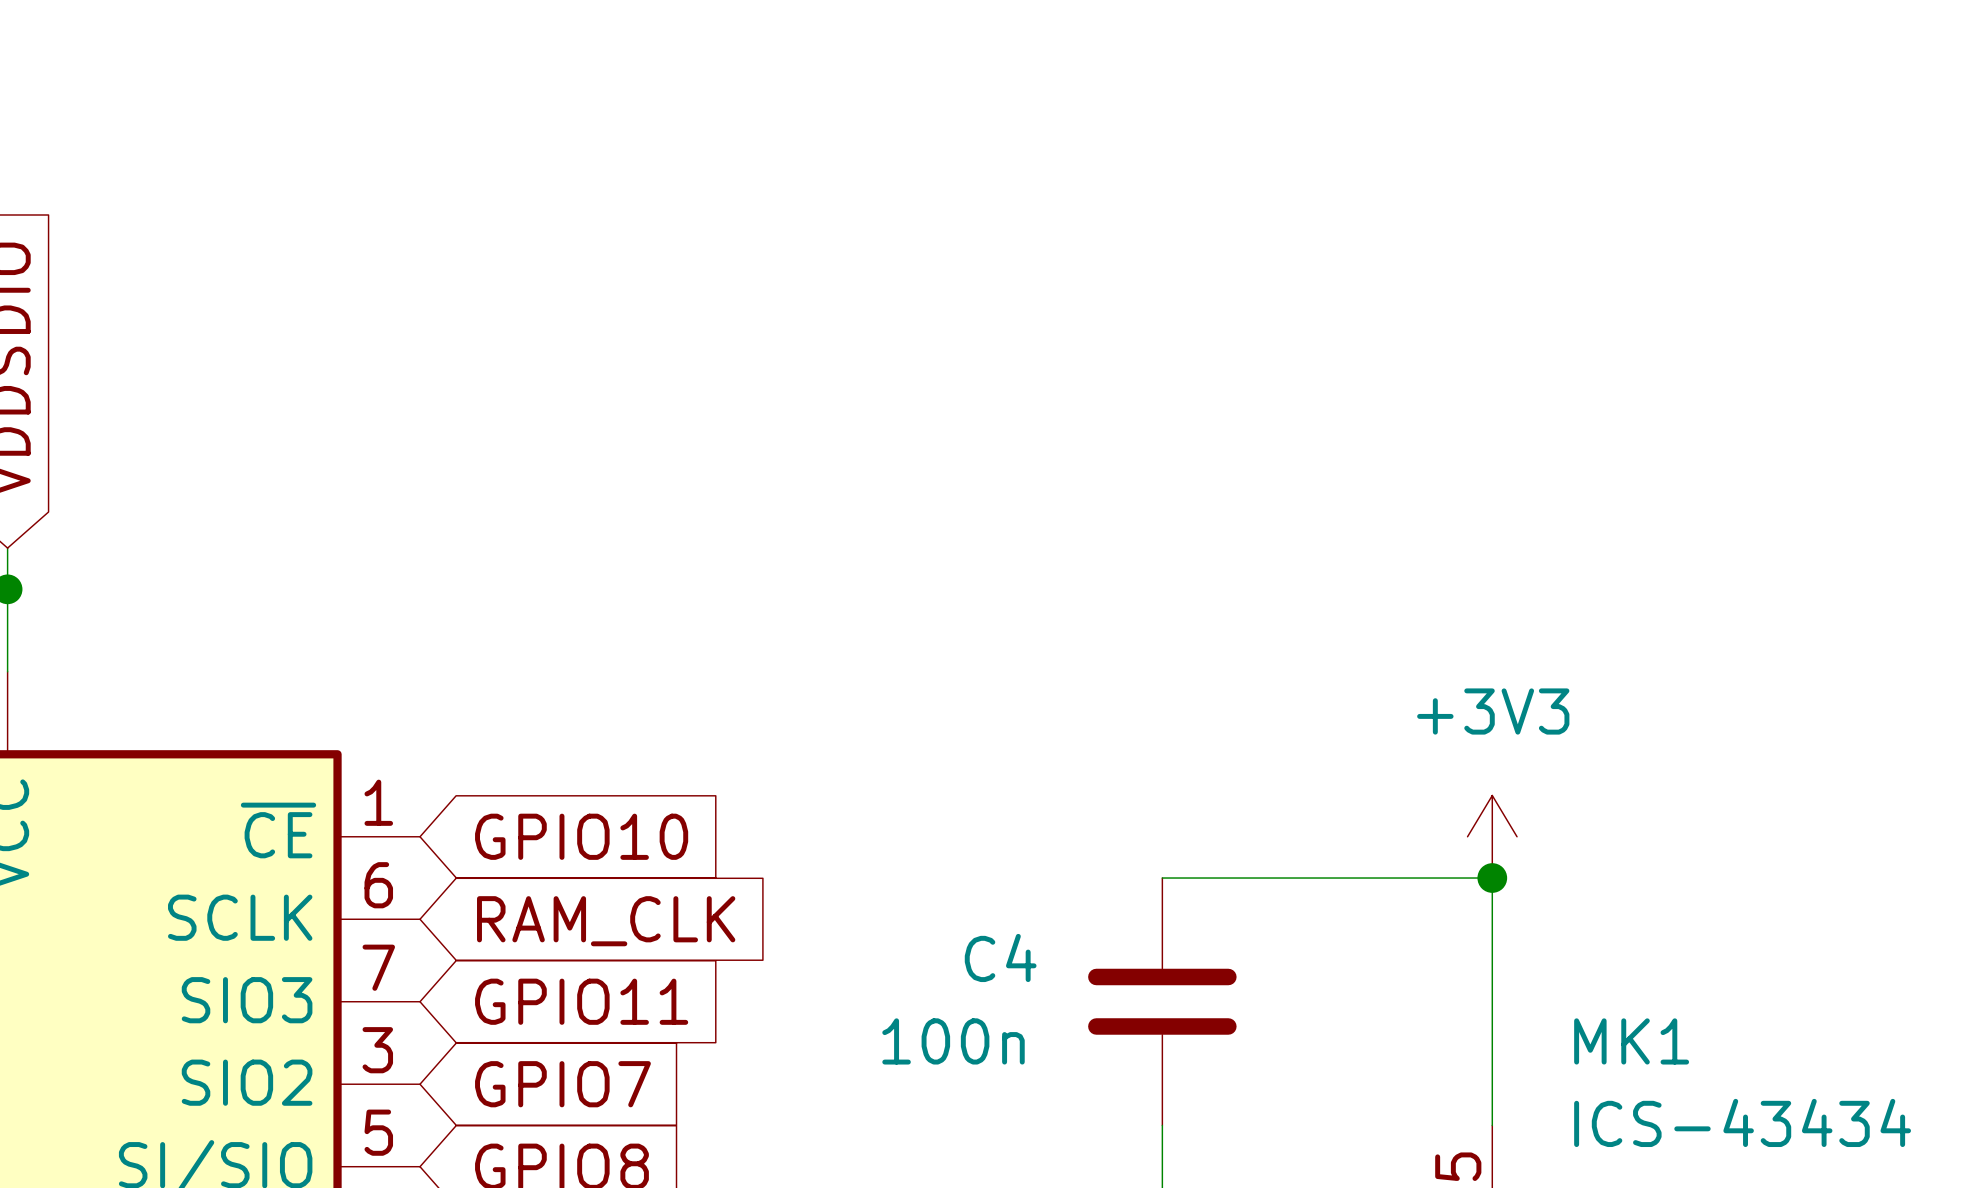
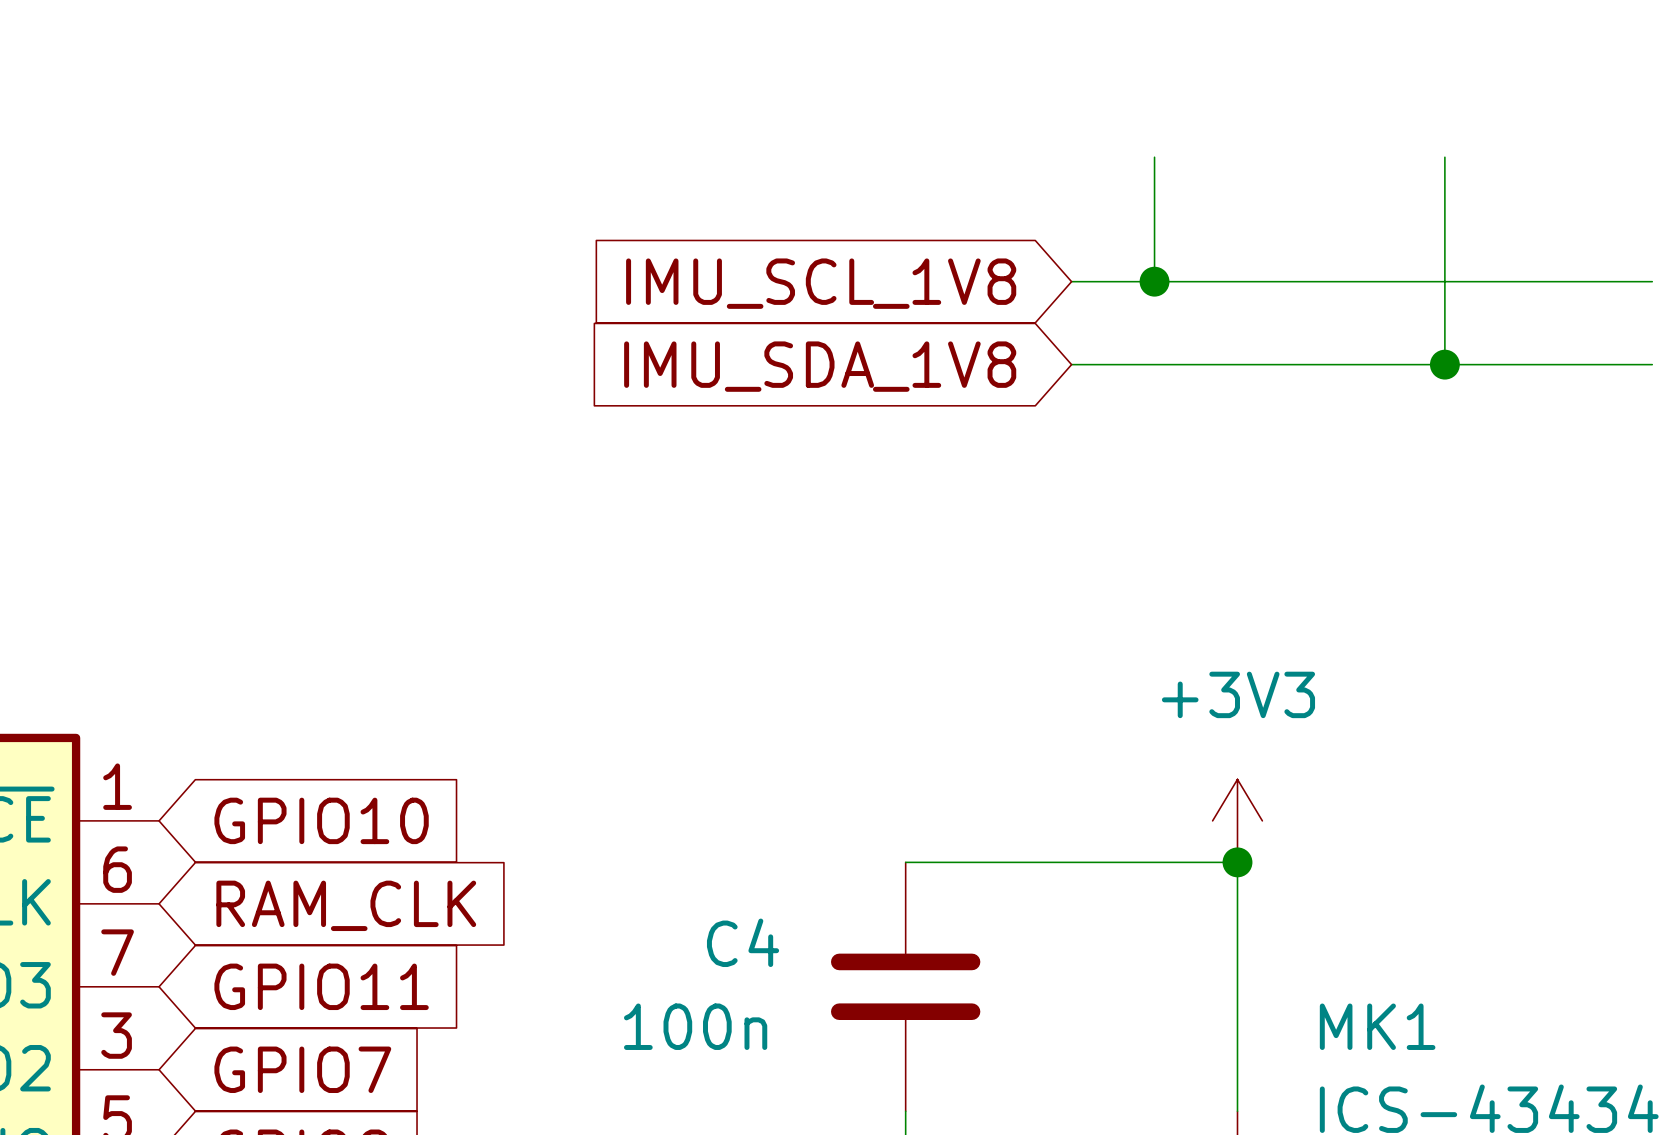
wire: none -> (1154, 157) (1154, 281)
wire: none -> (1444, 157) (1444, 364)
wire: none -> (1071, 281) (1652, 281)
junction: none -> (1154, 281)
global label: none -> IMU_SCL_1V8 (821, 283)
wire: none -> (1071, 364) (1652, 364)
junction: none -> (1444, 364)
global label: none -> IMU_SDA_1V8 (820, 366)

